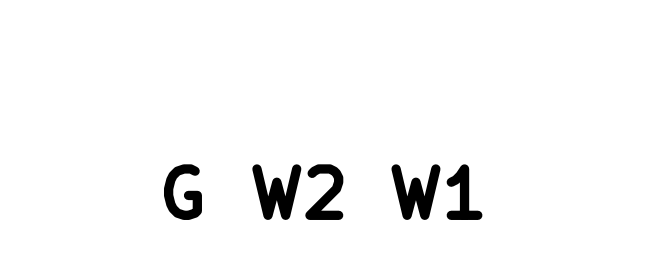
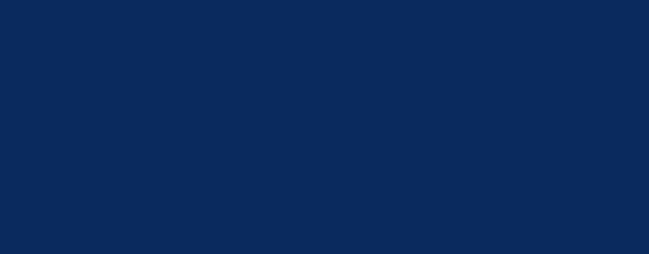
text: G (182, 192) -> none
text: W2 (297, 192) -> none
text: W1 (436, 192) -> none

